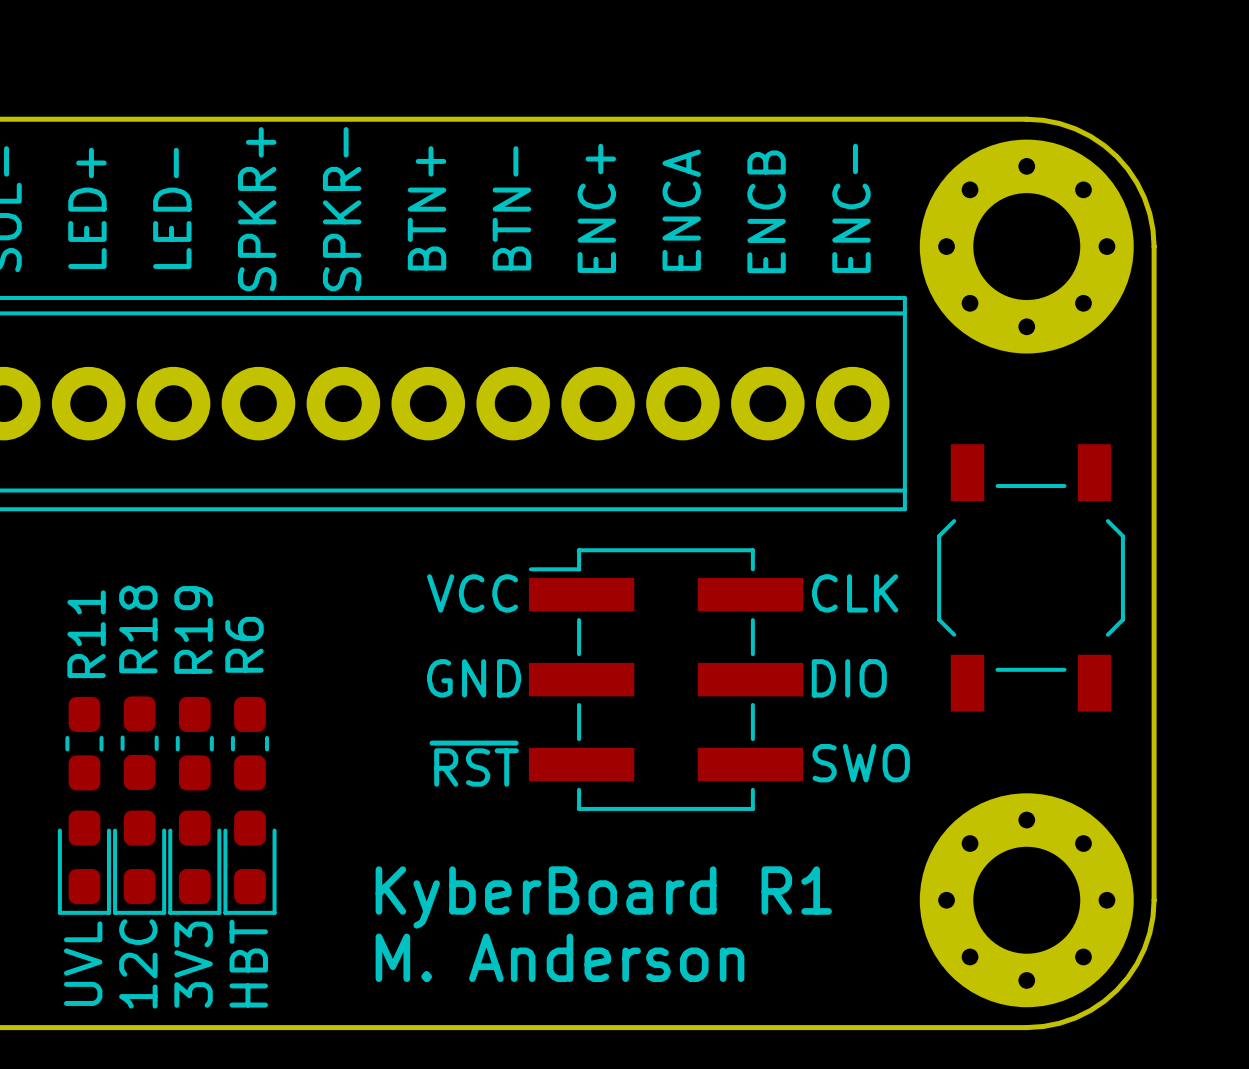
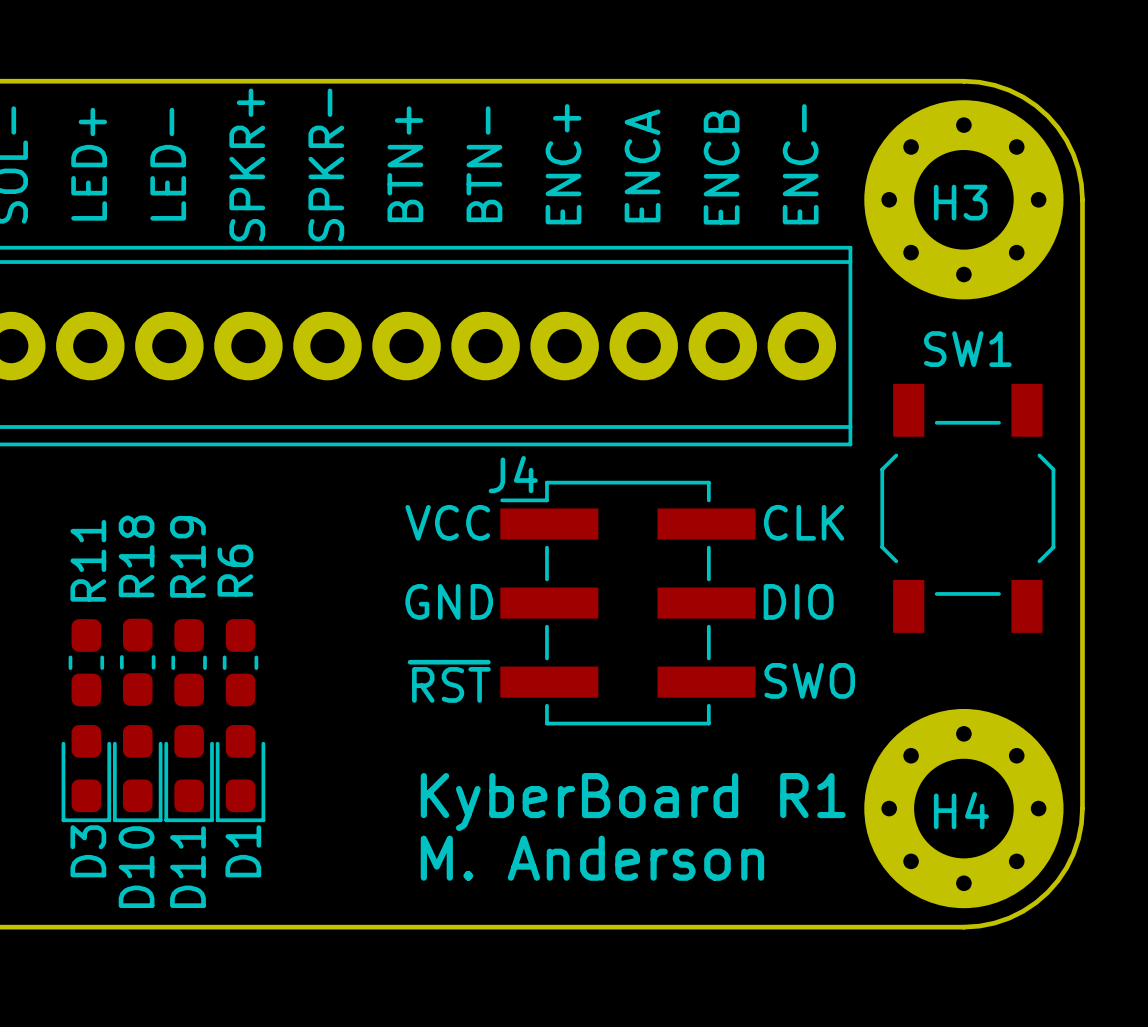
H3 name: none -> H3 (960, 202)
SW1 name: none -> SW1 (967, 349)
J4 name: none -> J4 (513, 474)
text position: KyberBoard R1 (603, 897) -> KyberBoard R1 (633, 802)
H4 name: none -> H4 (961, 810)
text position: M. Anderson (559, 957) -> M. Anderson (592, 858)
UVL name: UVL (83, 963) -> D3 (88, 851)
12C name: 12C (138, 963) -> D10 (136, 867)
HBT name: HBT (248, 963) -> D1 (243, 851)
3V3 name: 3V3 (193, 964) -> D11 (187, 867)

